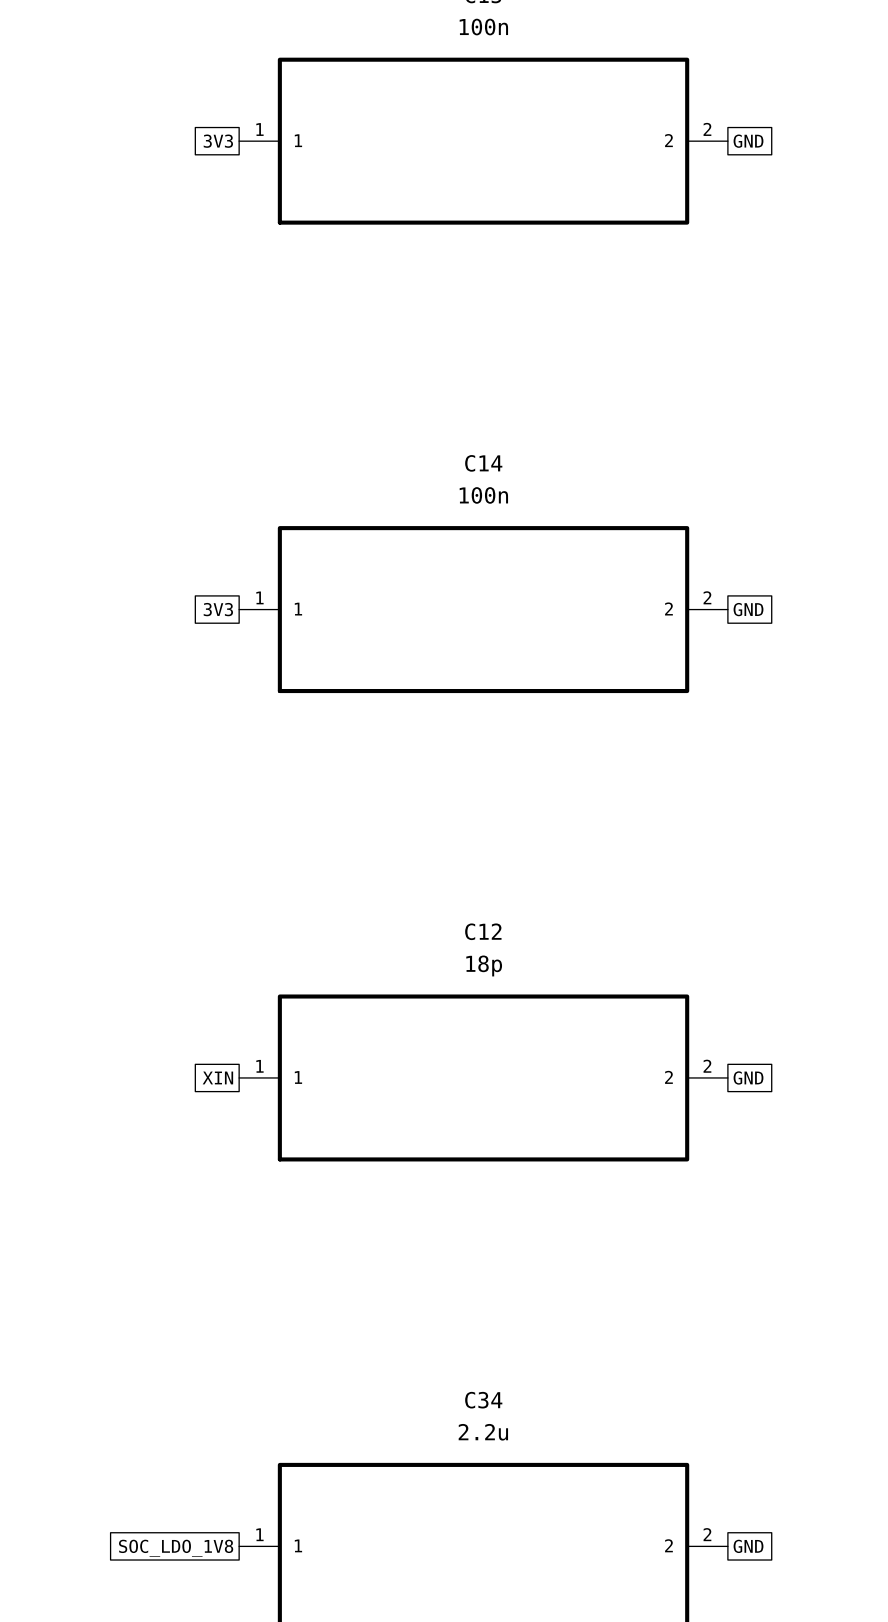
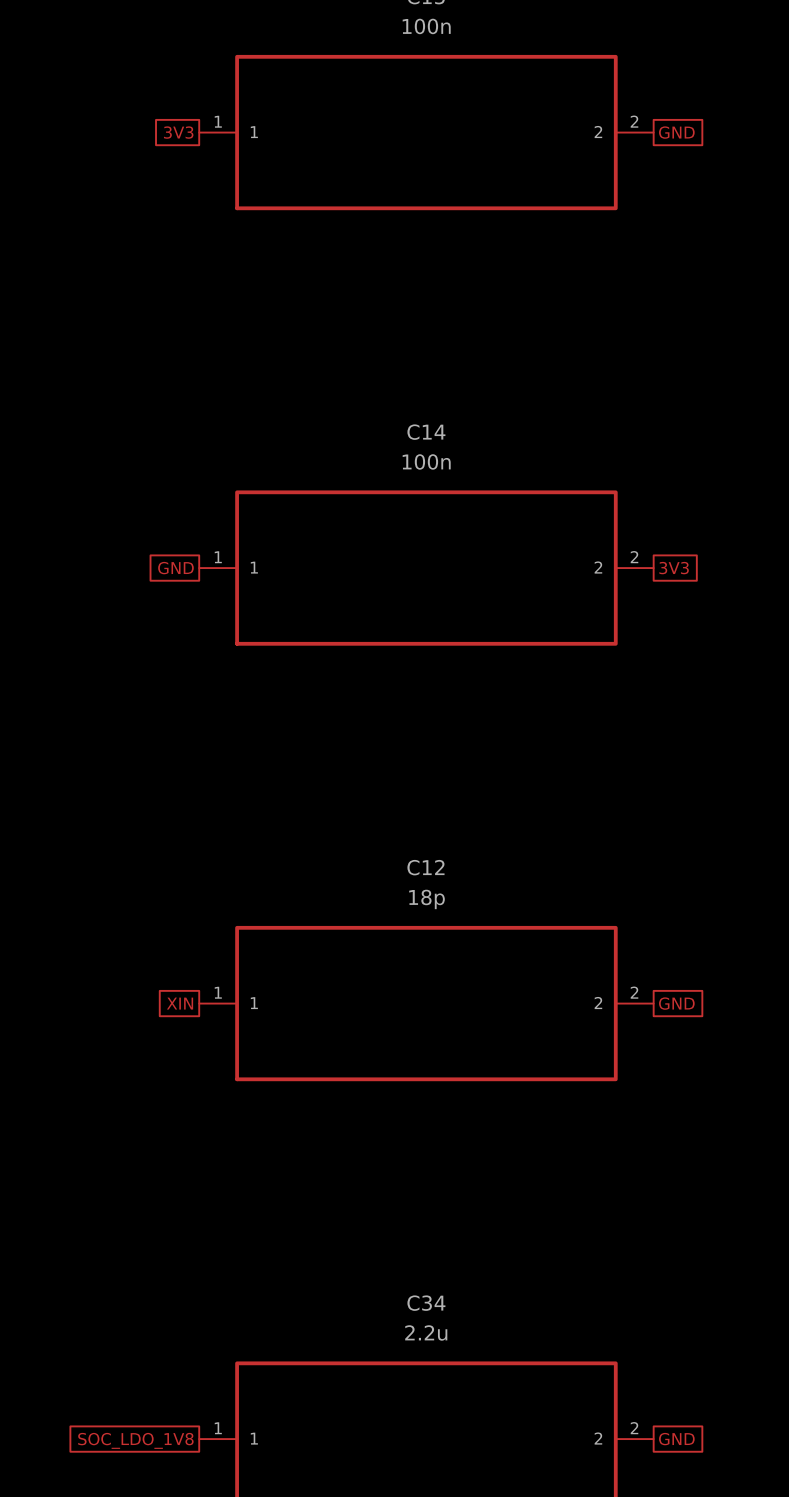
global label: 3V3 (218, 609) -> GND (175, 568)
global label: GND (748, 609) -> 3V3 (674, 568)

